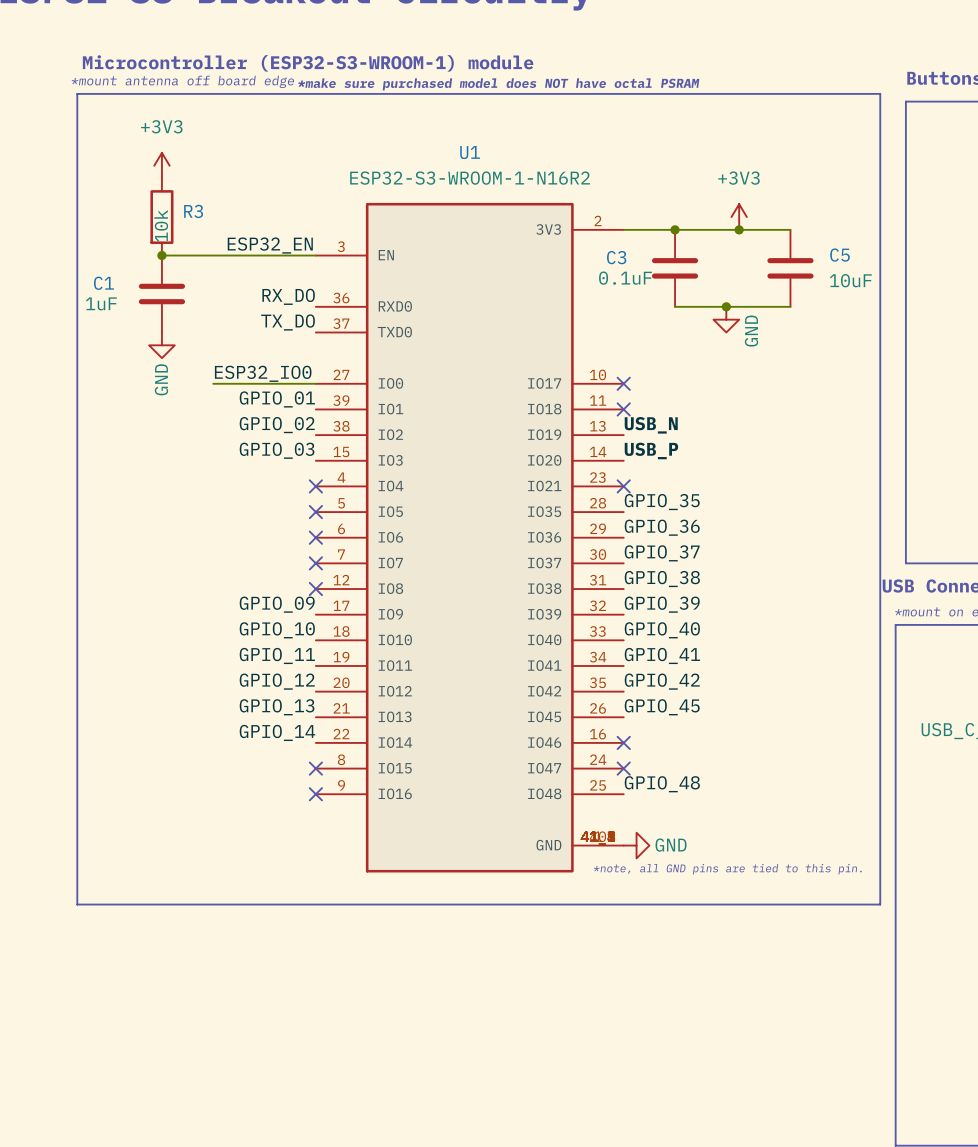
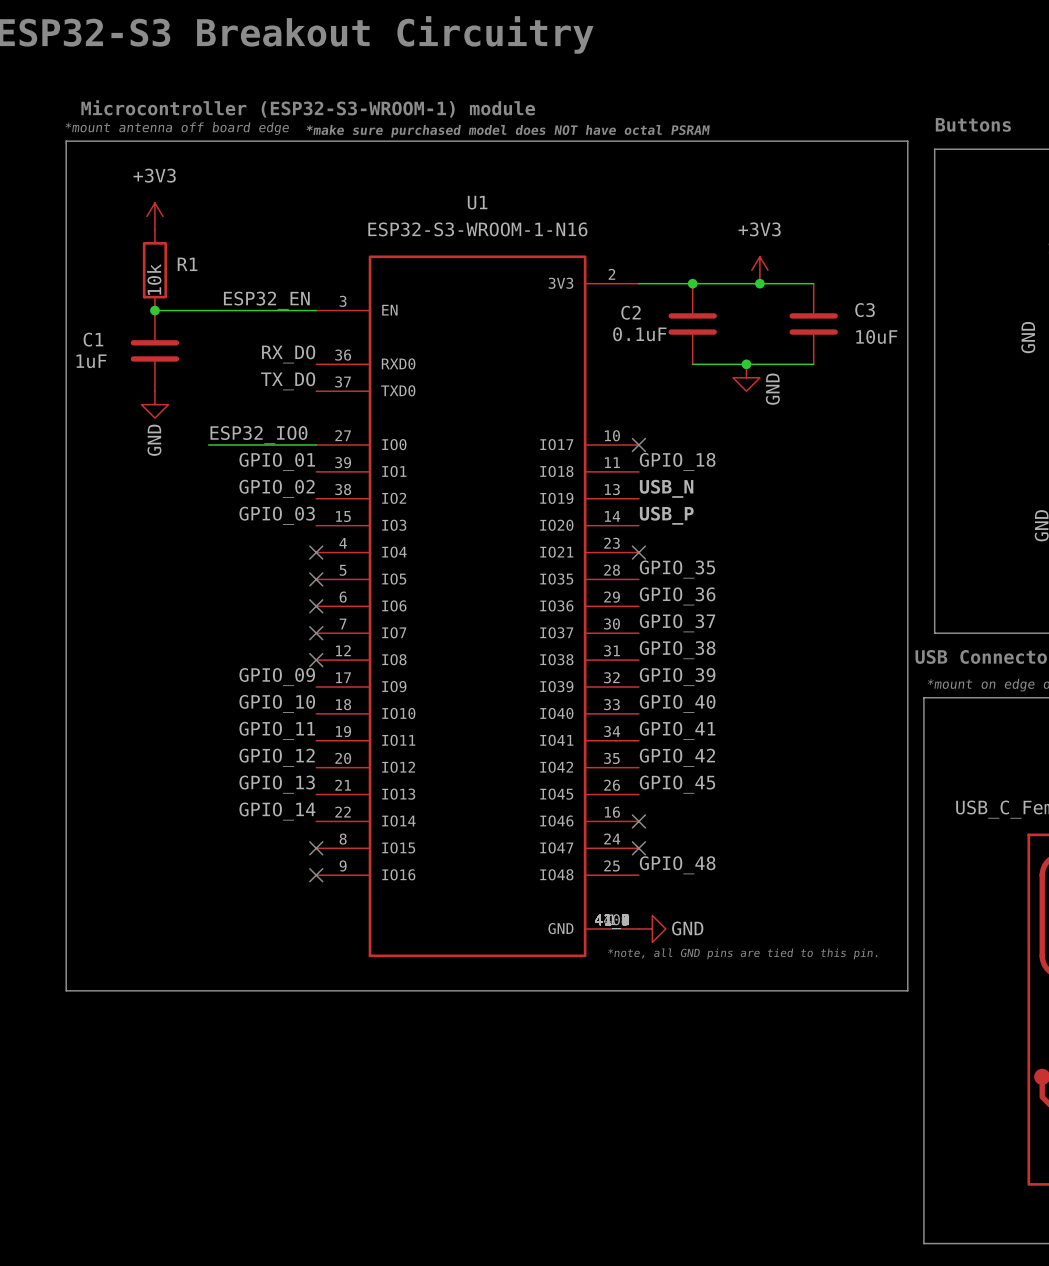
U1 value: ESP32-S3-WROOM-1-N16R2 (470, 178) -> ESP32-S3-WROOM-1-N16 (477, 229)
R3 name: R3 (193, 211) -> R1 (187, 264)
C5 name: C5 (839, 255) -> C3 (865, 310)
C3 name: C3 (616, 257) -> C2 (631, 312)
label: none -> GPIO_18 (677, 461)
no-connect mark: (623, 409) -> none

